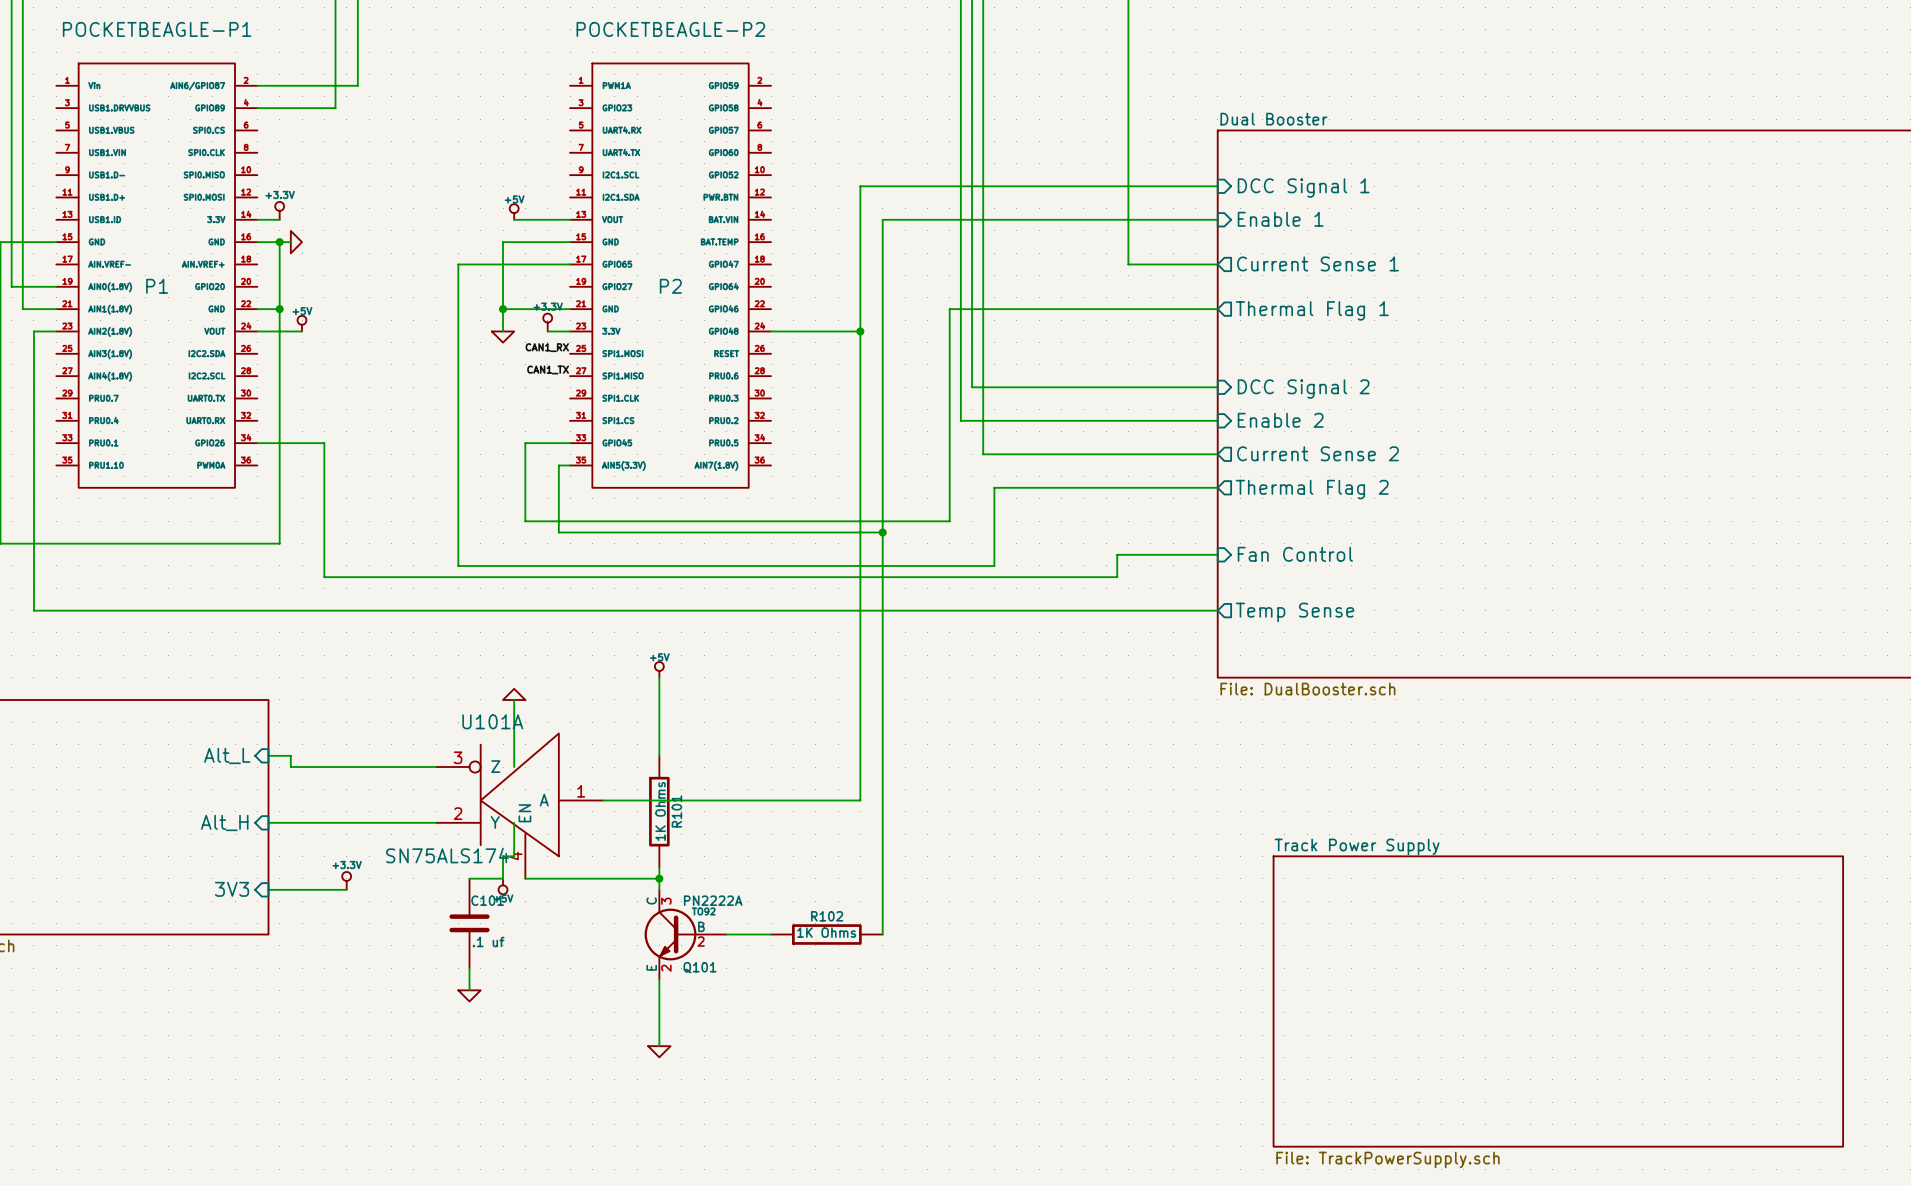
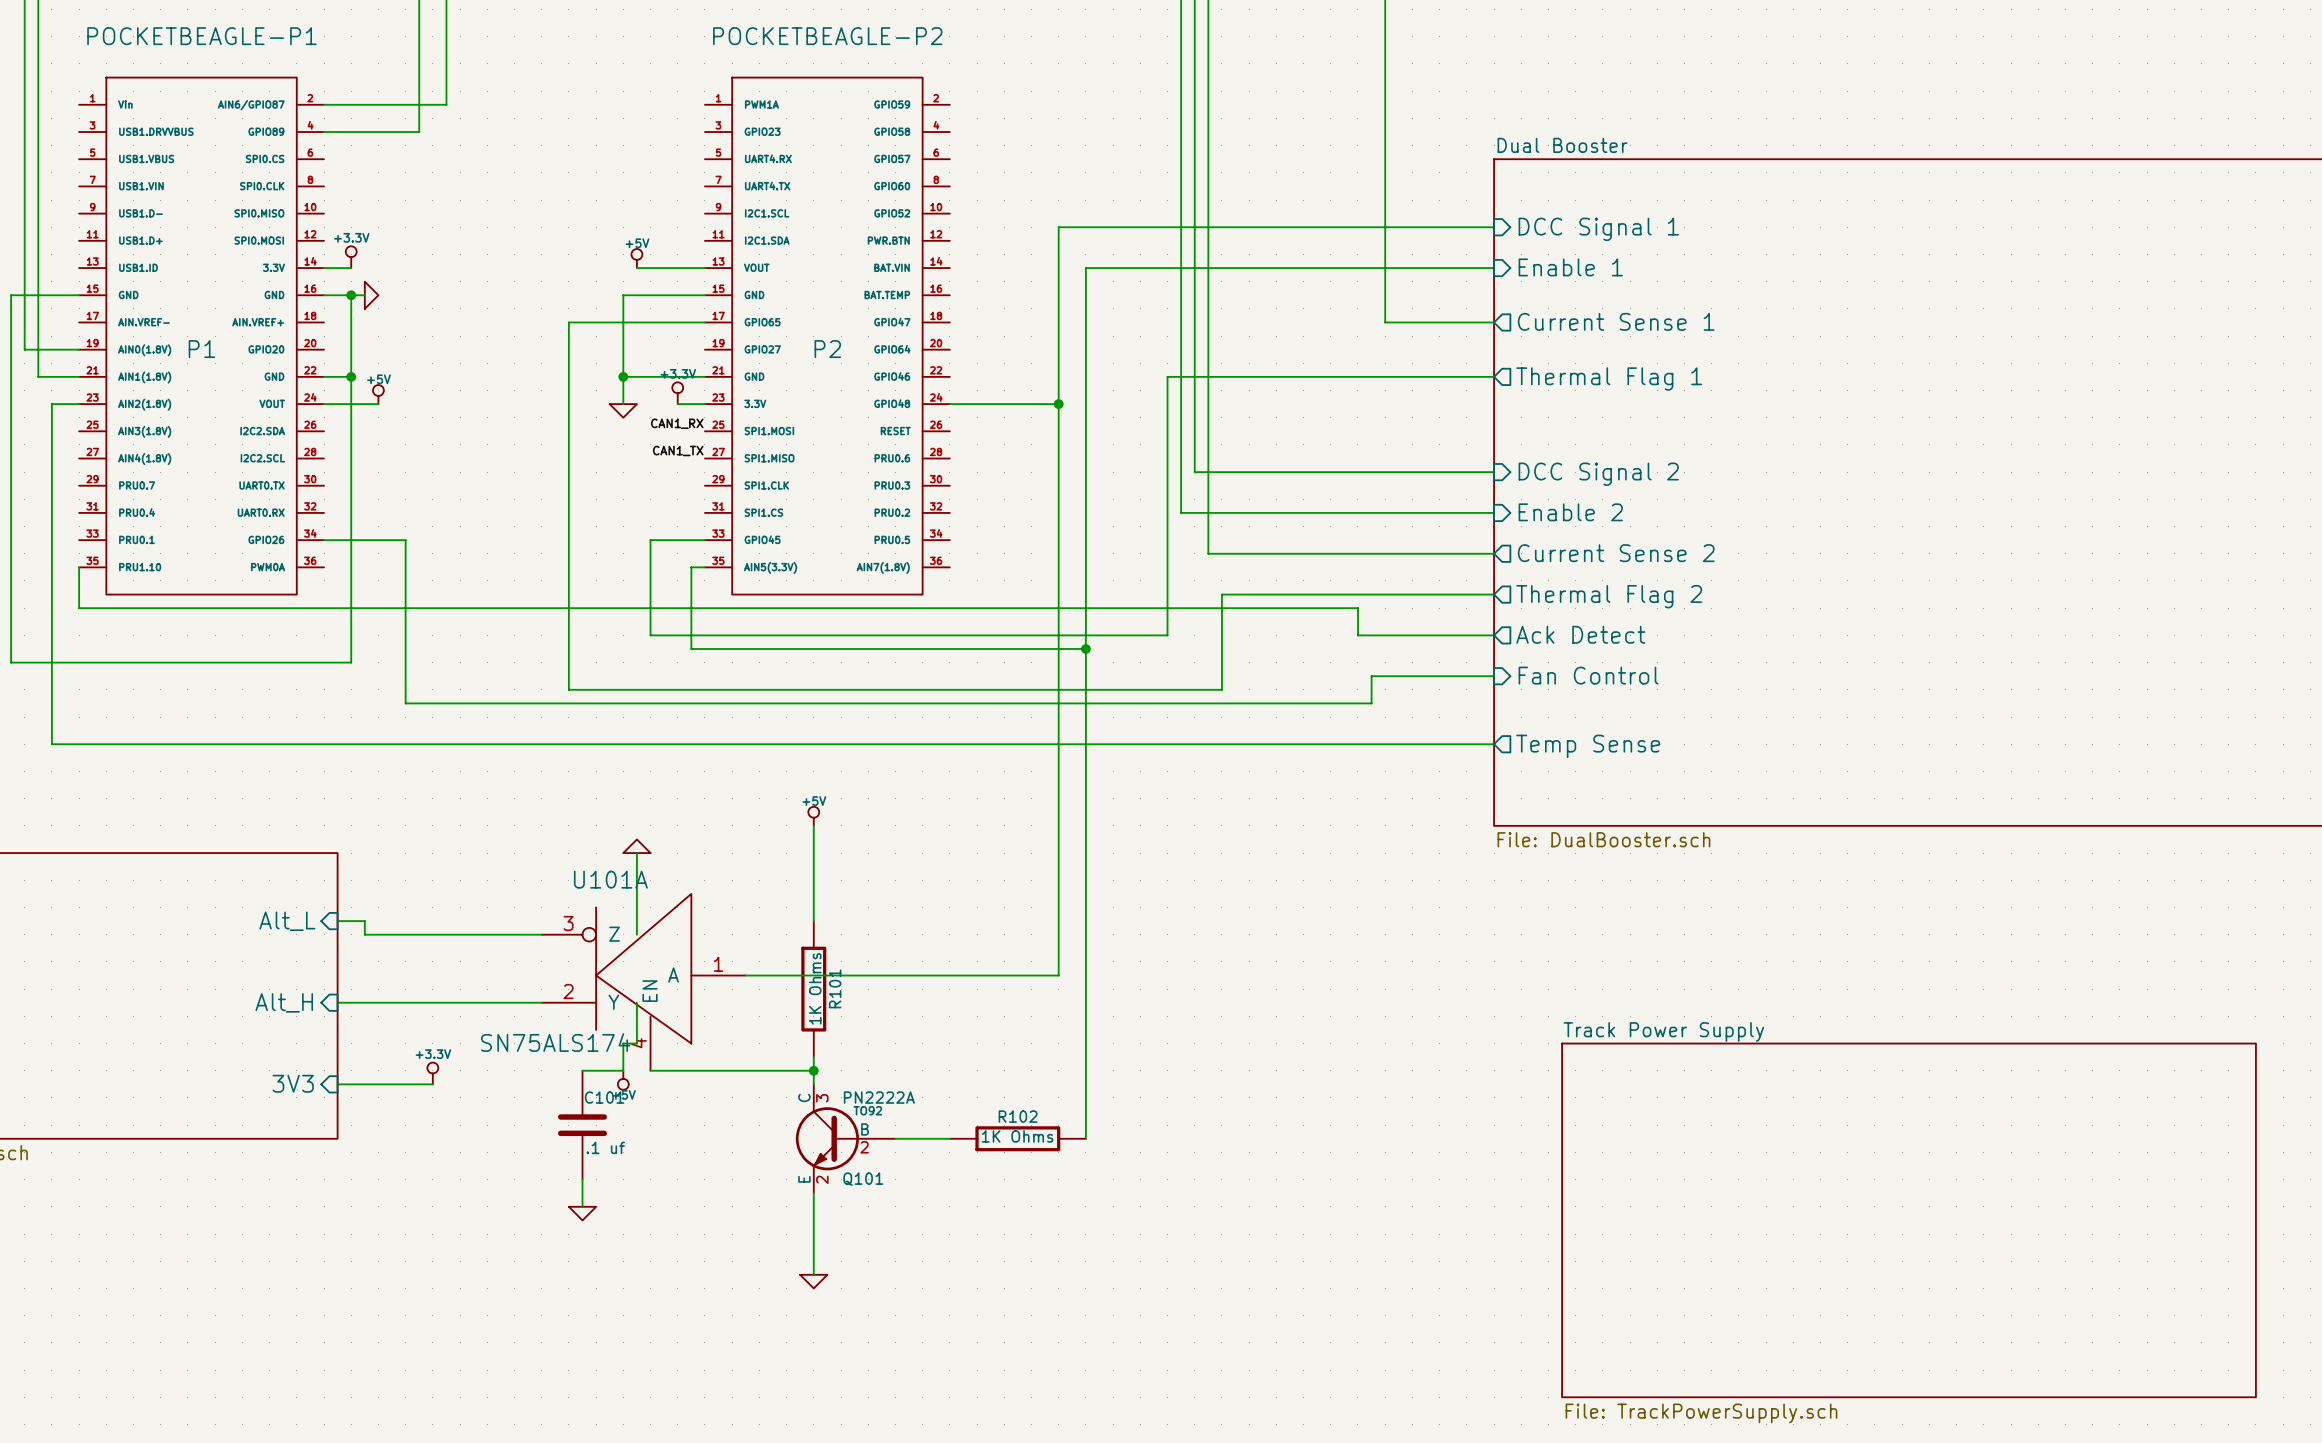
wire: none -> (79, 567) (79, 608) (1357, 608) (1357, 635) (1494, 635)
sheet pin: none -> Ack Detect (1580, 634)

